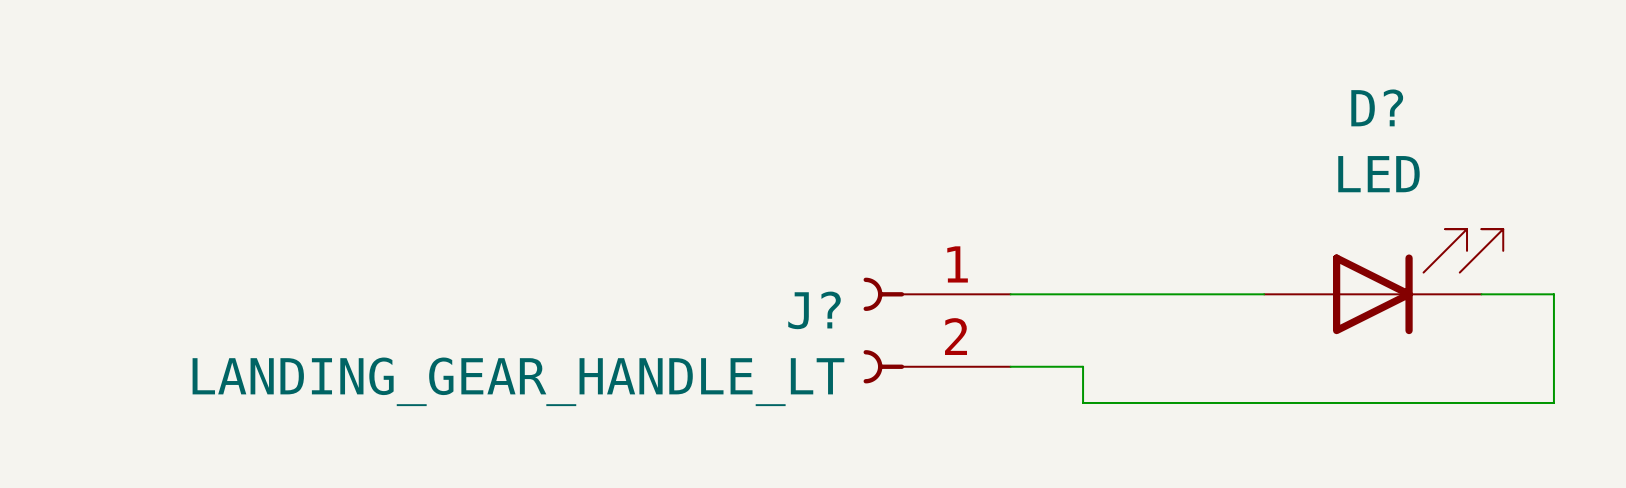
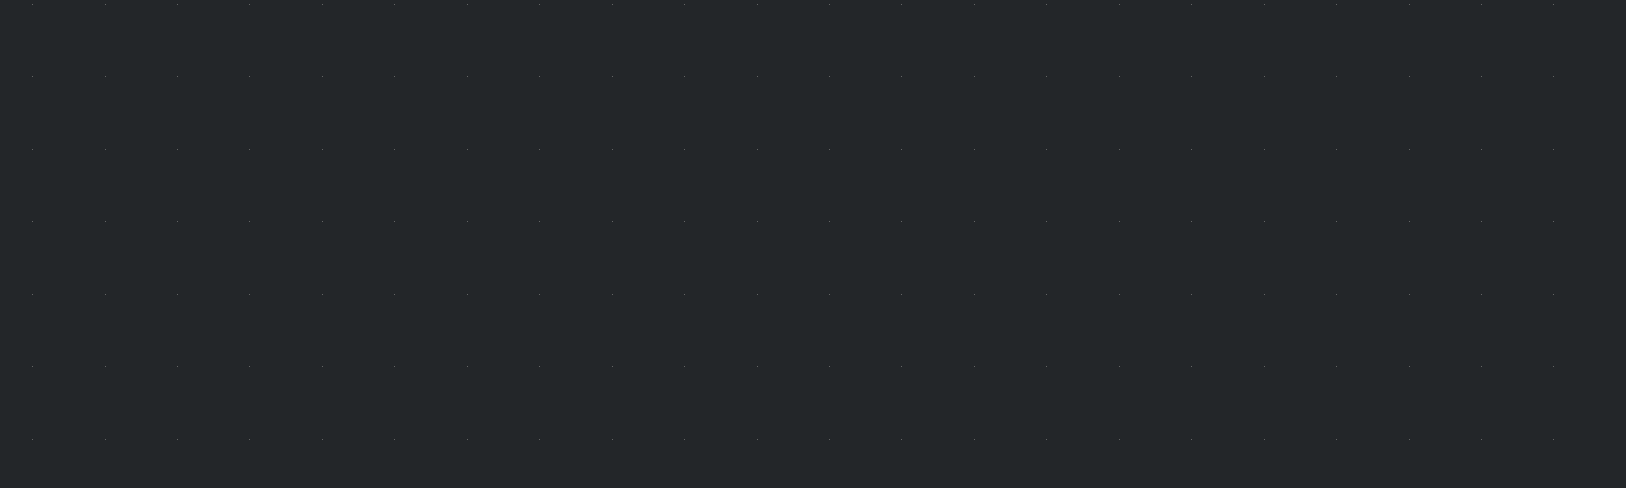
D?: LED (1383, 281) -> none
wire: (1010, 294) (1264, 294) -> none
wire: (1481, 294) (1553, 294) (1553, 402) (1083, 402) (1083, 366) (1010, 366) -> none
J?: LANDING_GEAR_HANDLE_LT (937, 330) -> none

